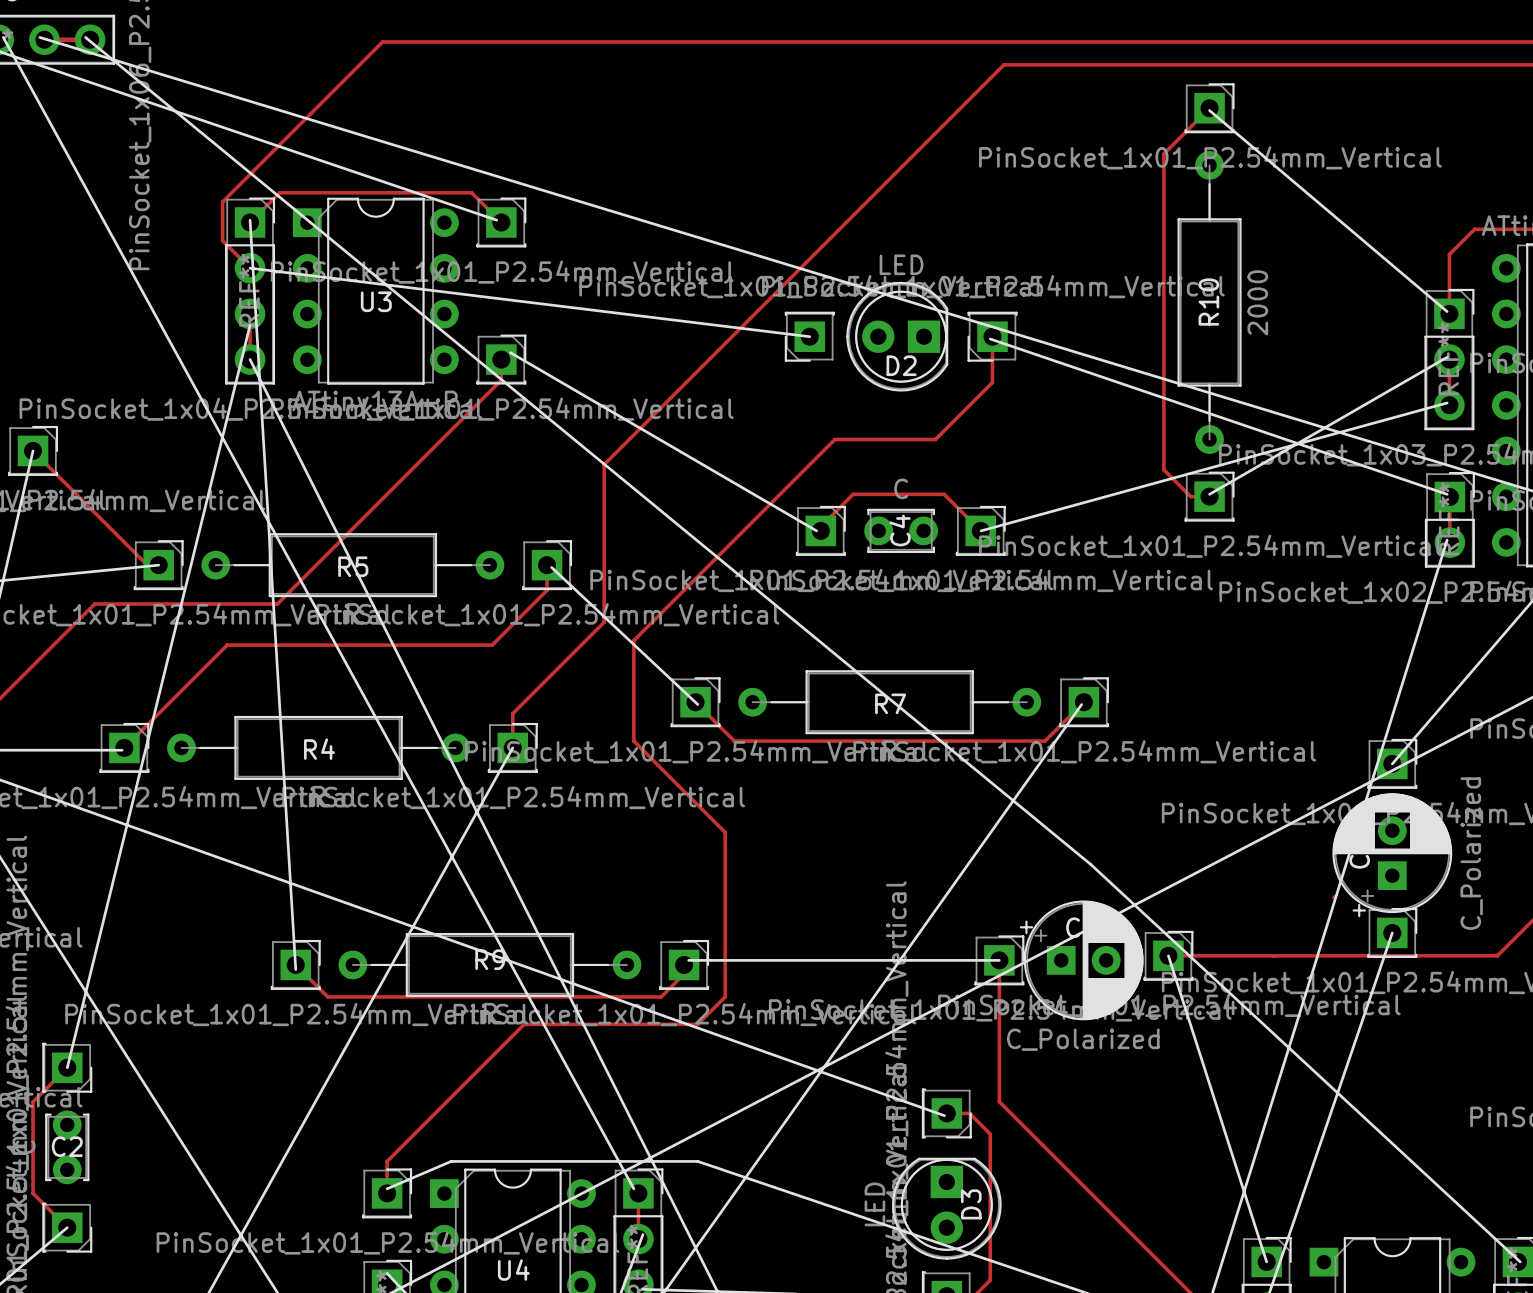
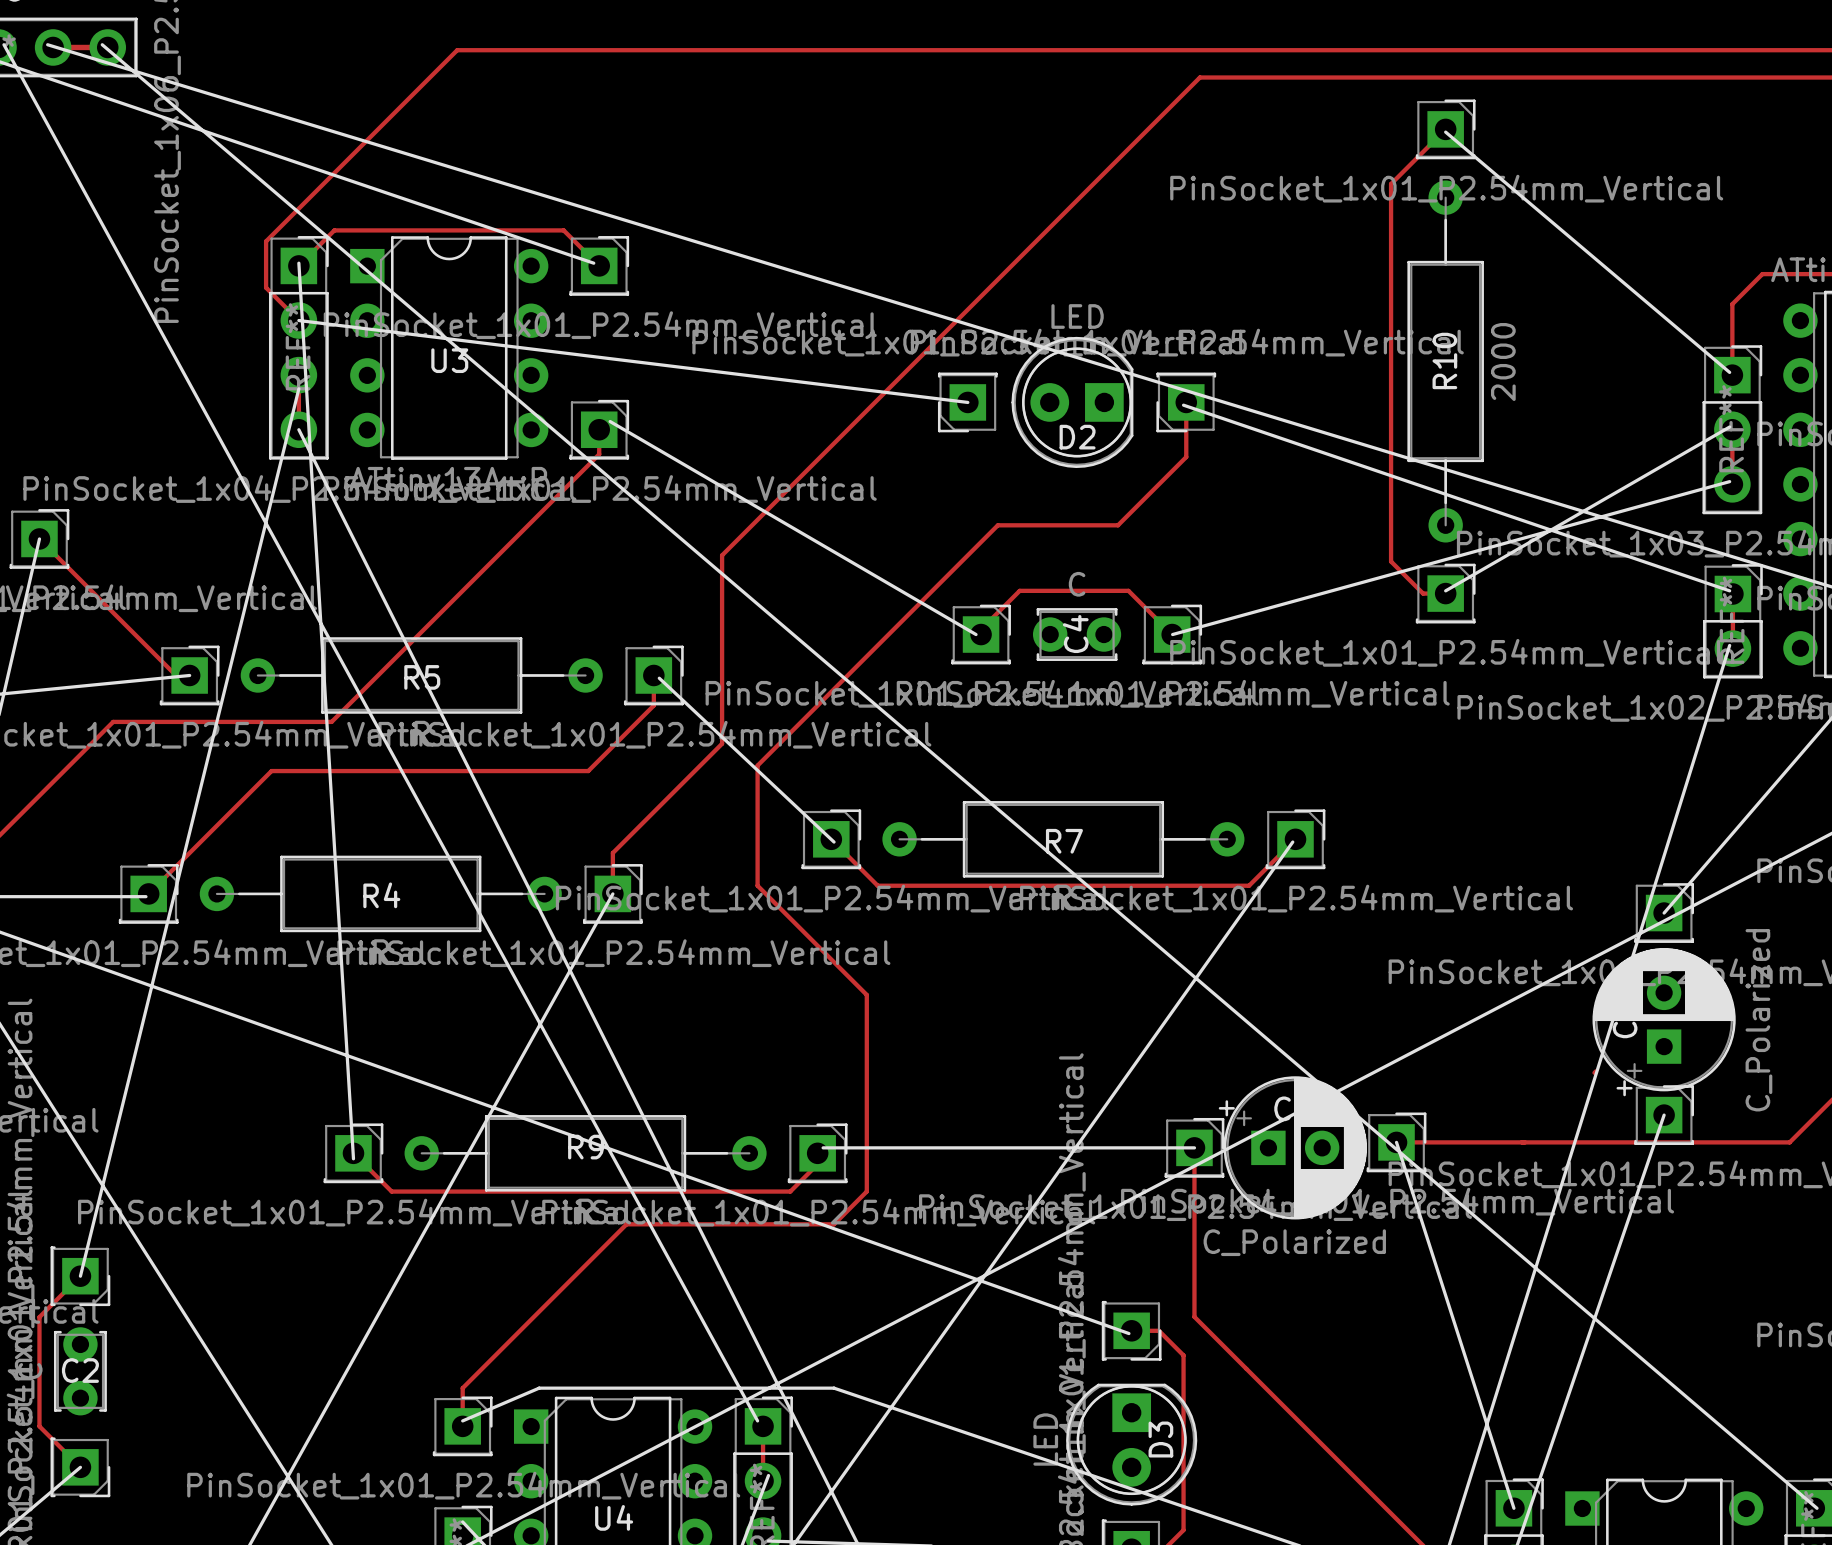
line: (85, 37) (1090, 864) (1520, 1261) -> (102, 44) (1817, 1508)

